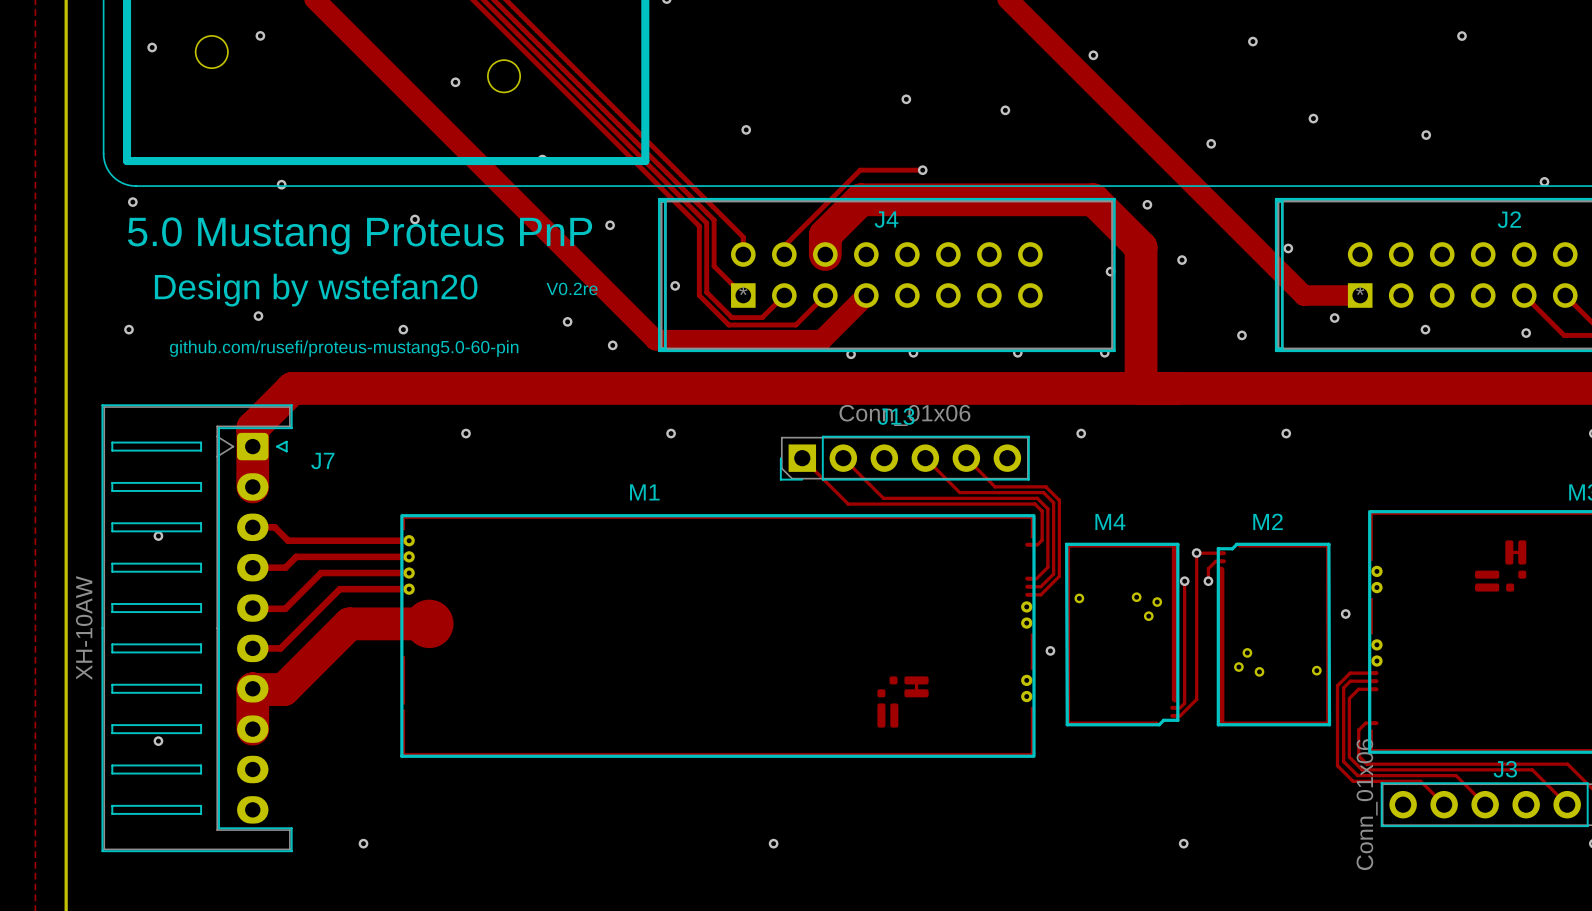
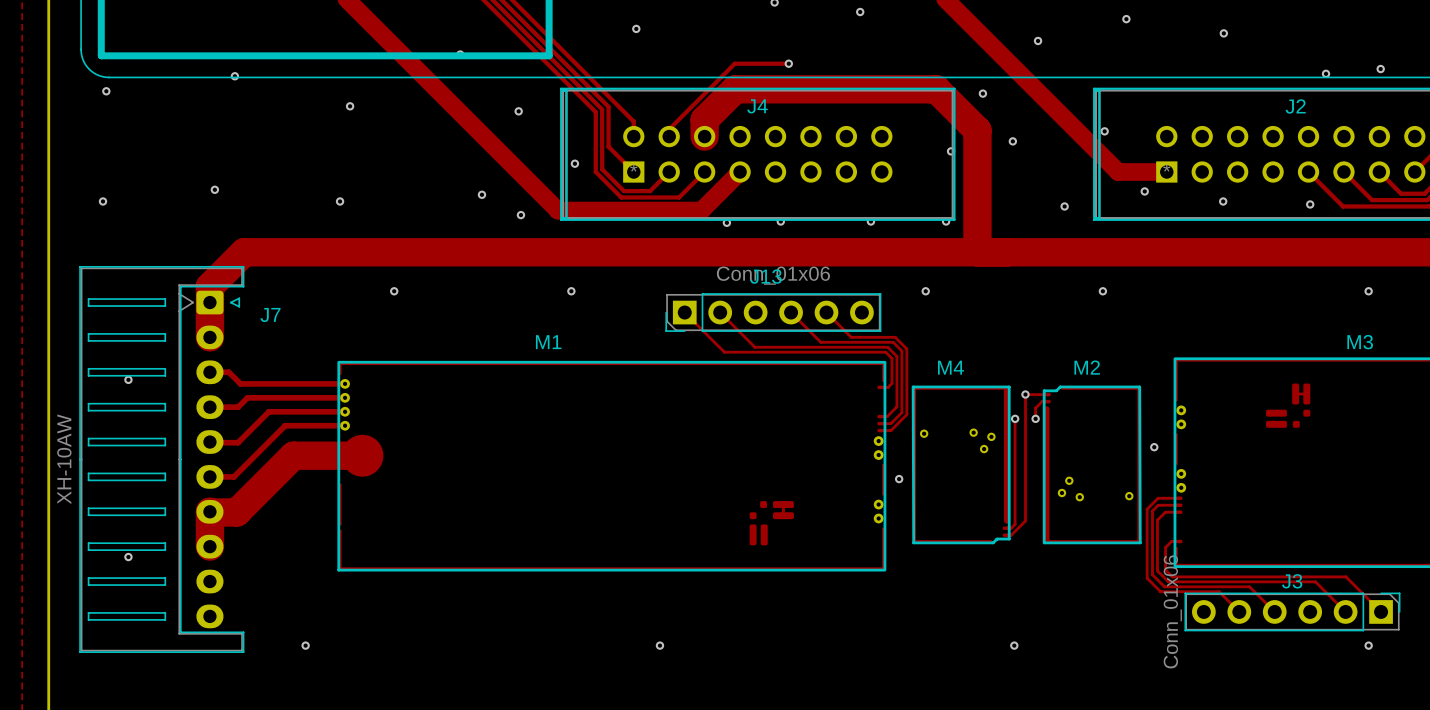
text: 5.0 Mustang Proteus PnP (359, 235) -> none
text: V0.2re (572, 288) -> none
text: Design by wstefan20 (316, 290) -> none
text: github.com/rusefi/proteus-mustang5.0-60-pin (344, 348) -> none

